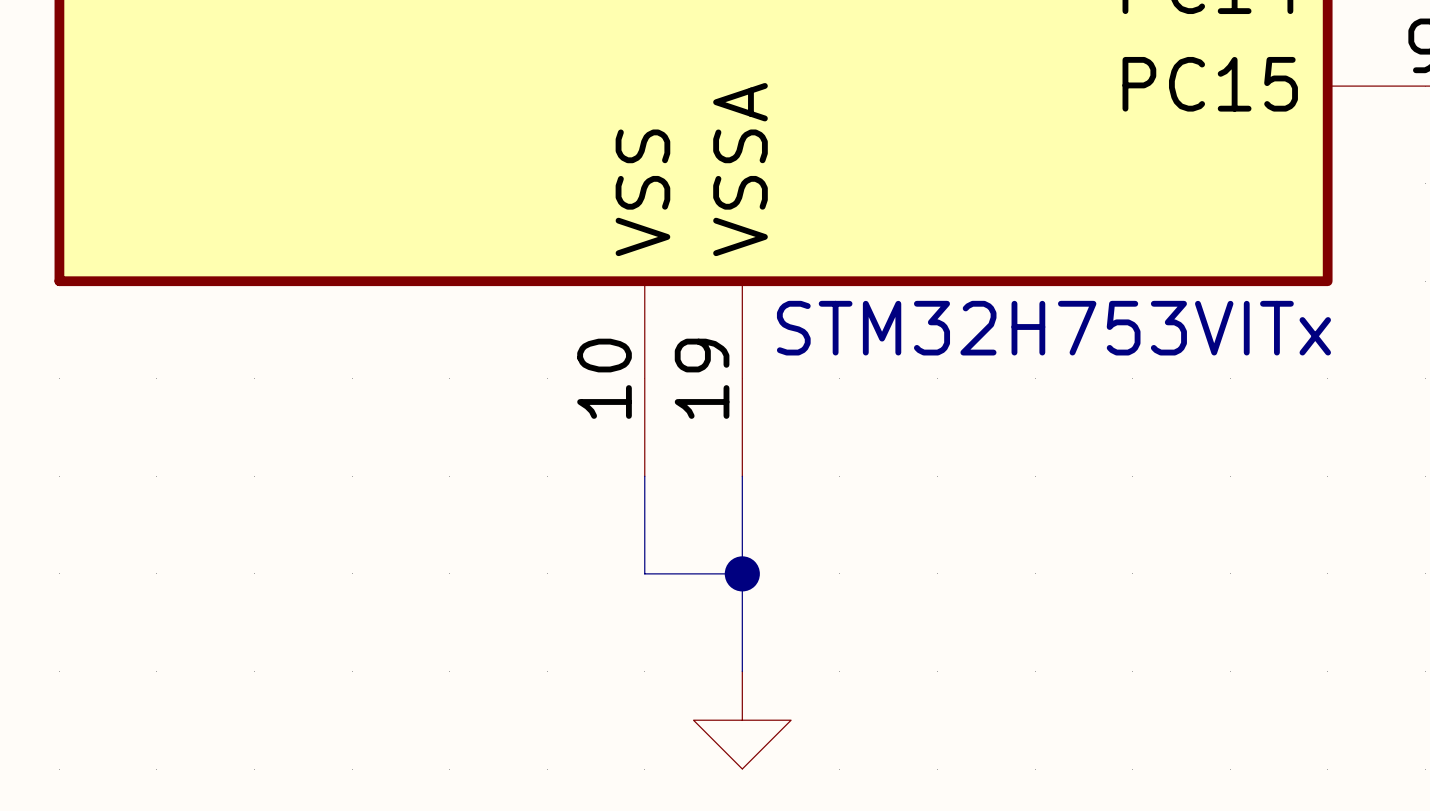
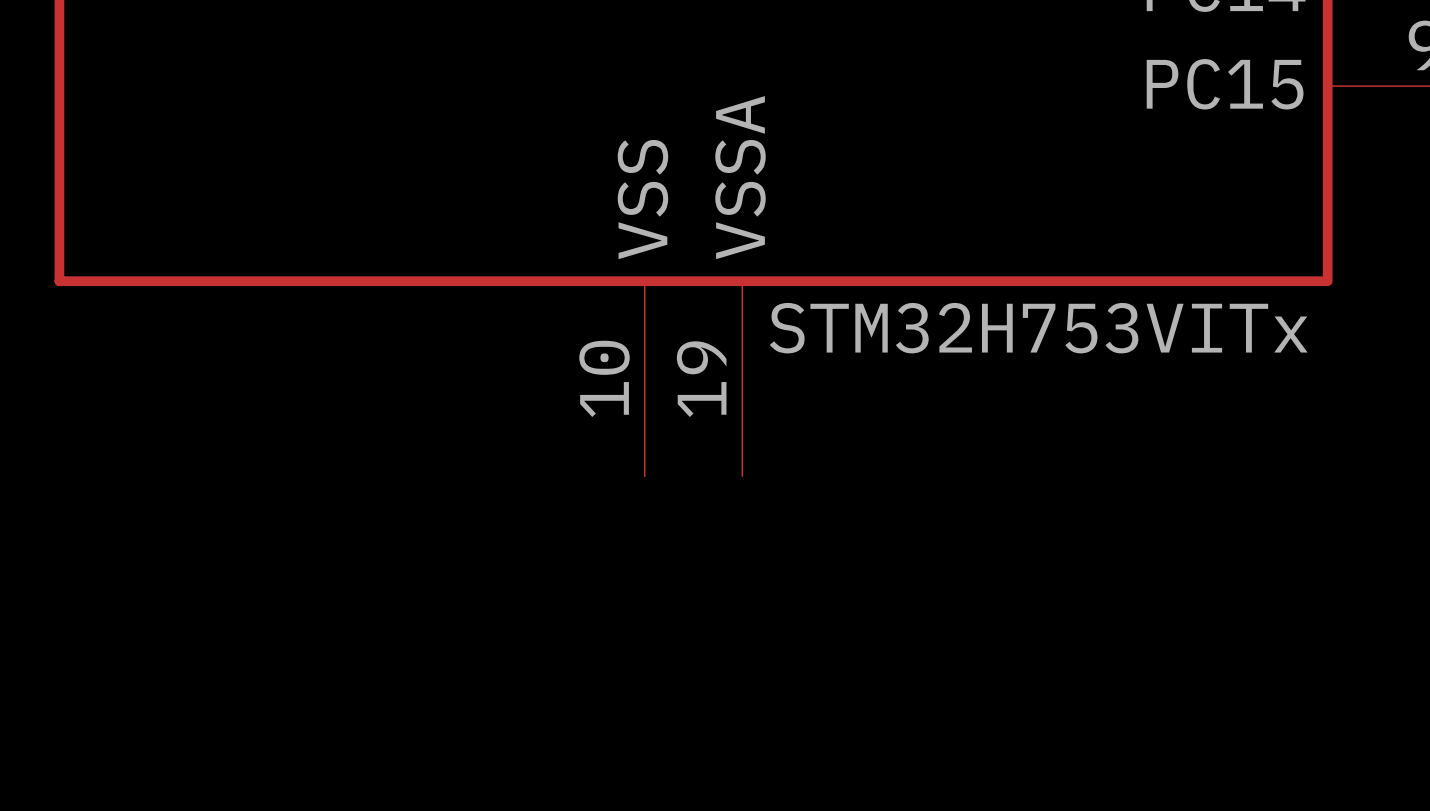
wire: (644, 476) (644, 573) (742, 573) -> none
wire: (742, 476) (742, 671) -> none
junction: (742, 573) -> none
power symbol: (742, 720) -> none

